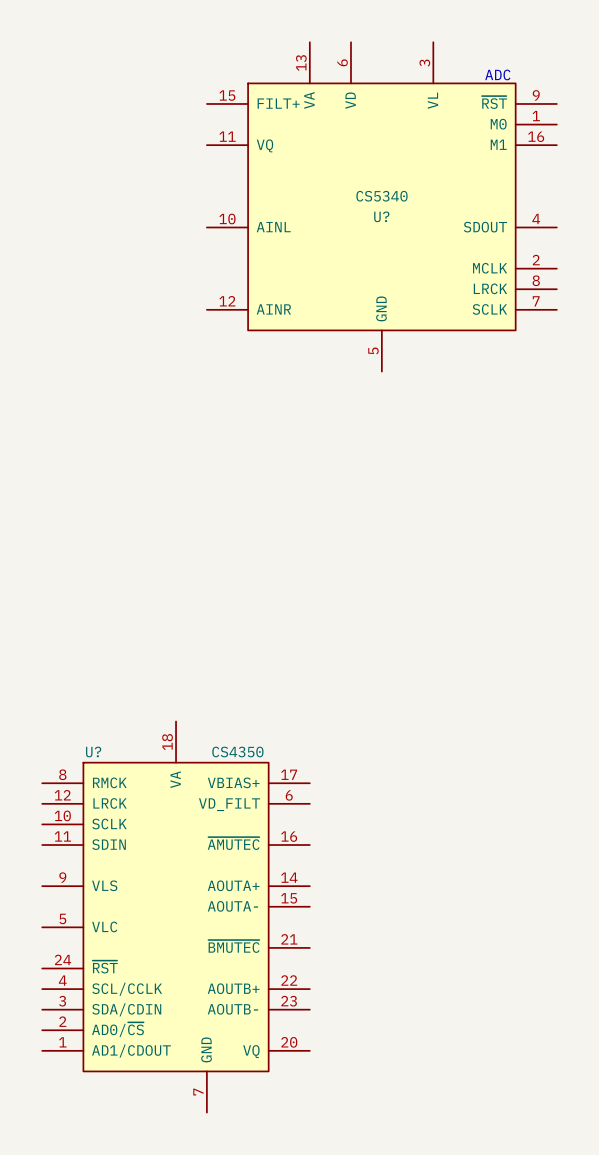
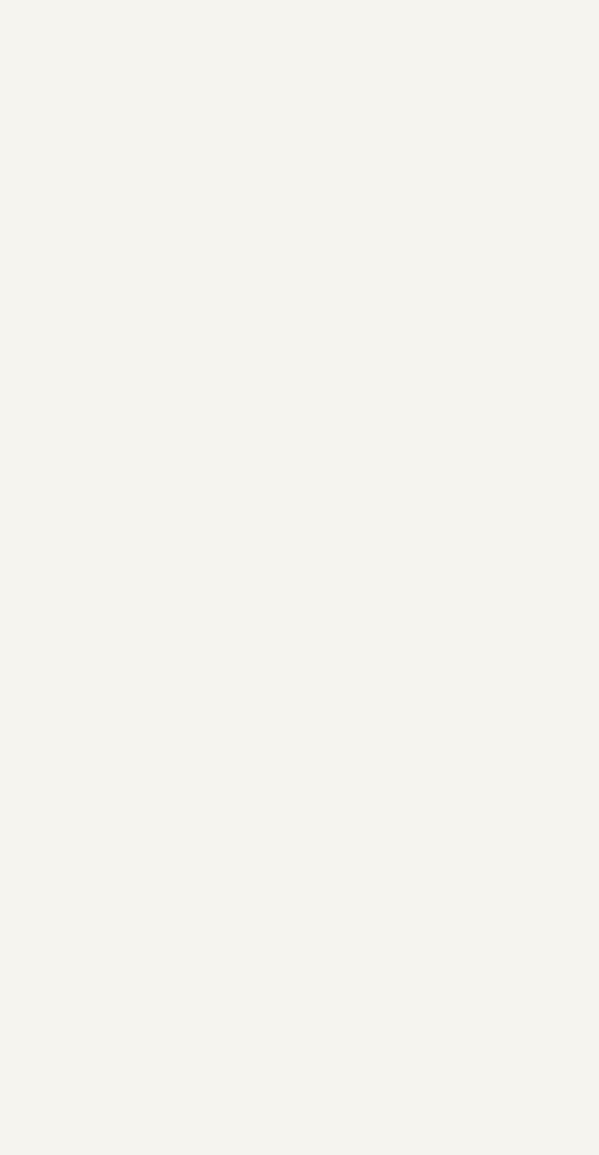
text: ADC (497, 74) -> none
U?: CS5340 (381, 206) -> none
U?: CS4350 (176, 917) -> none

